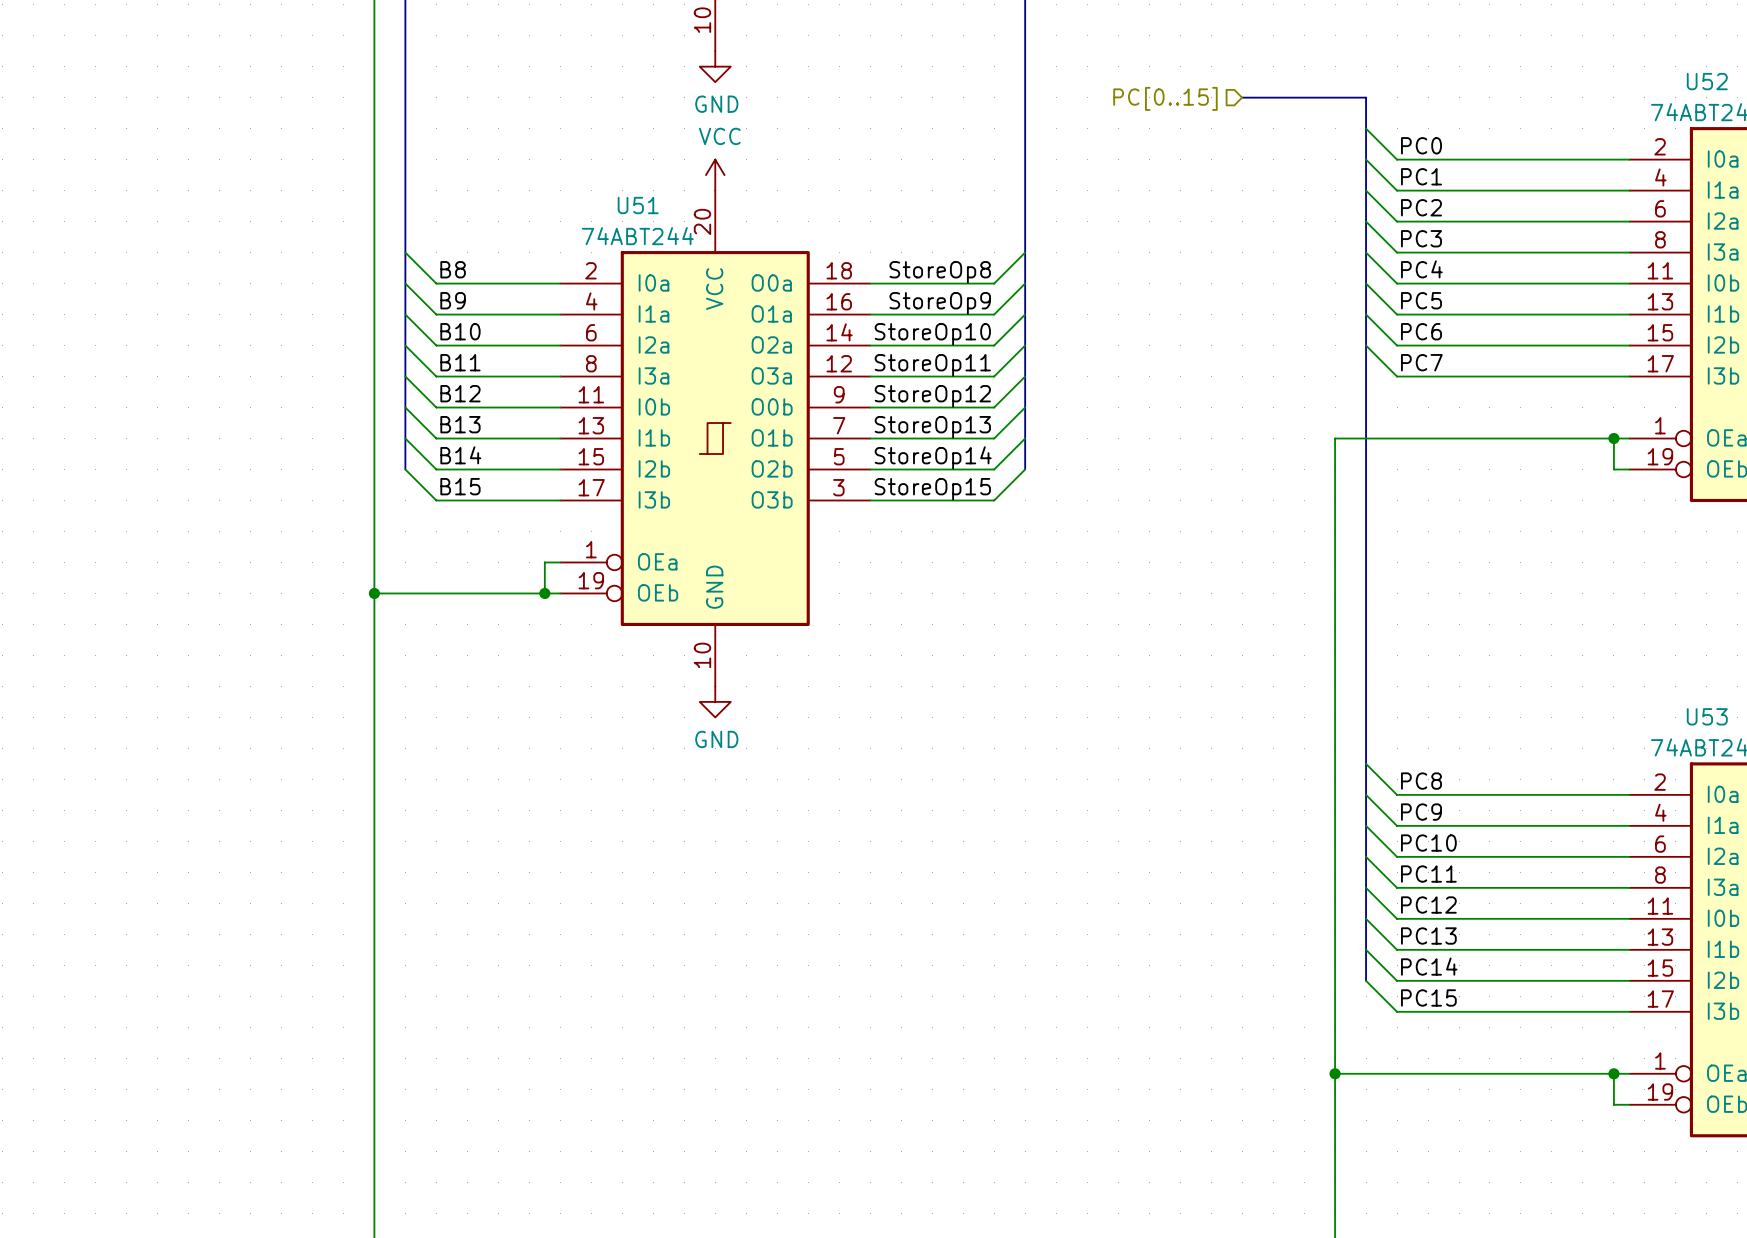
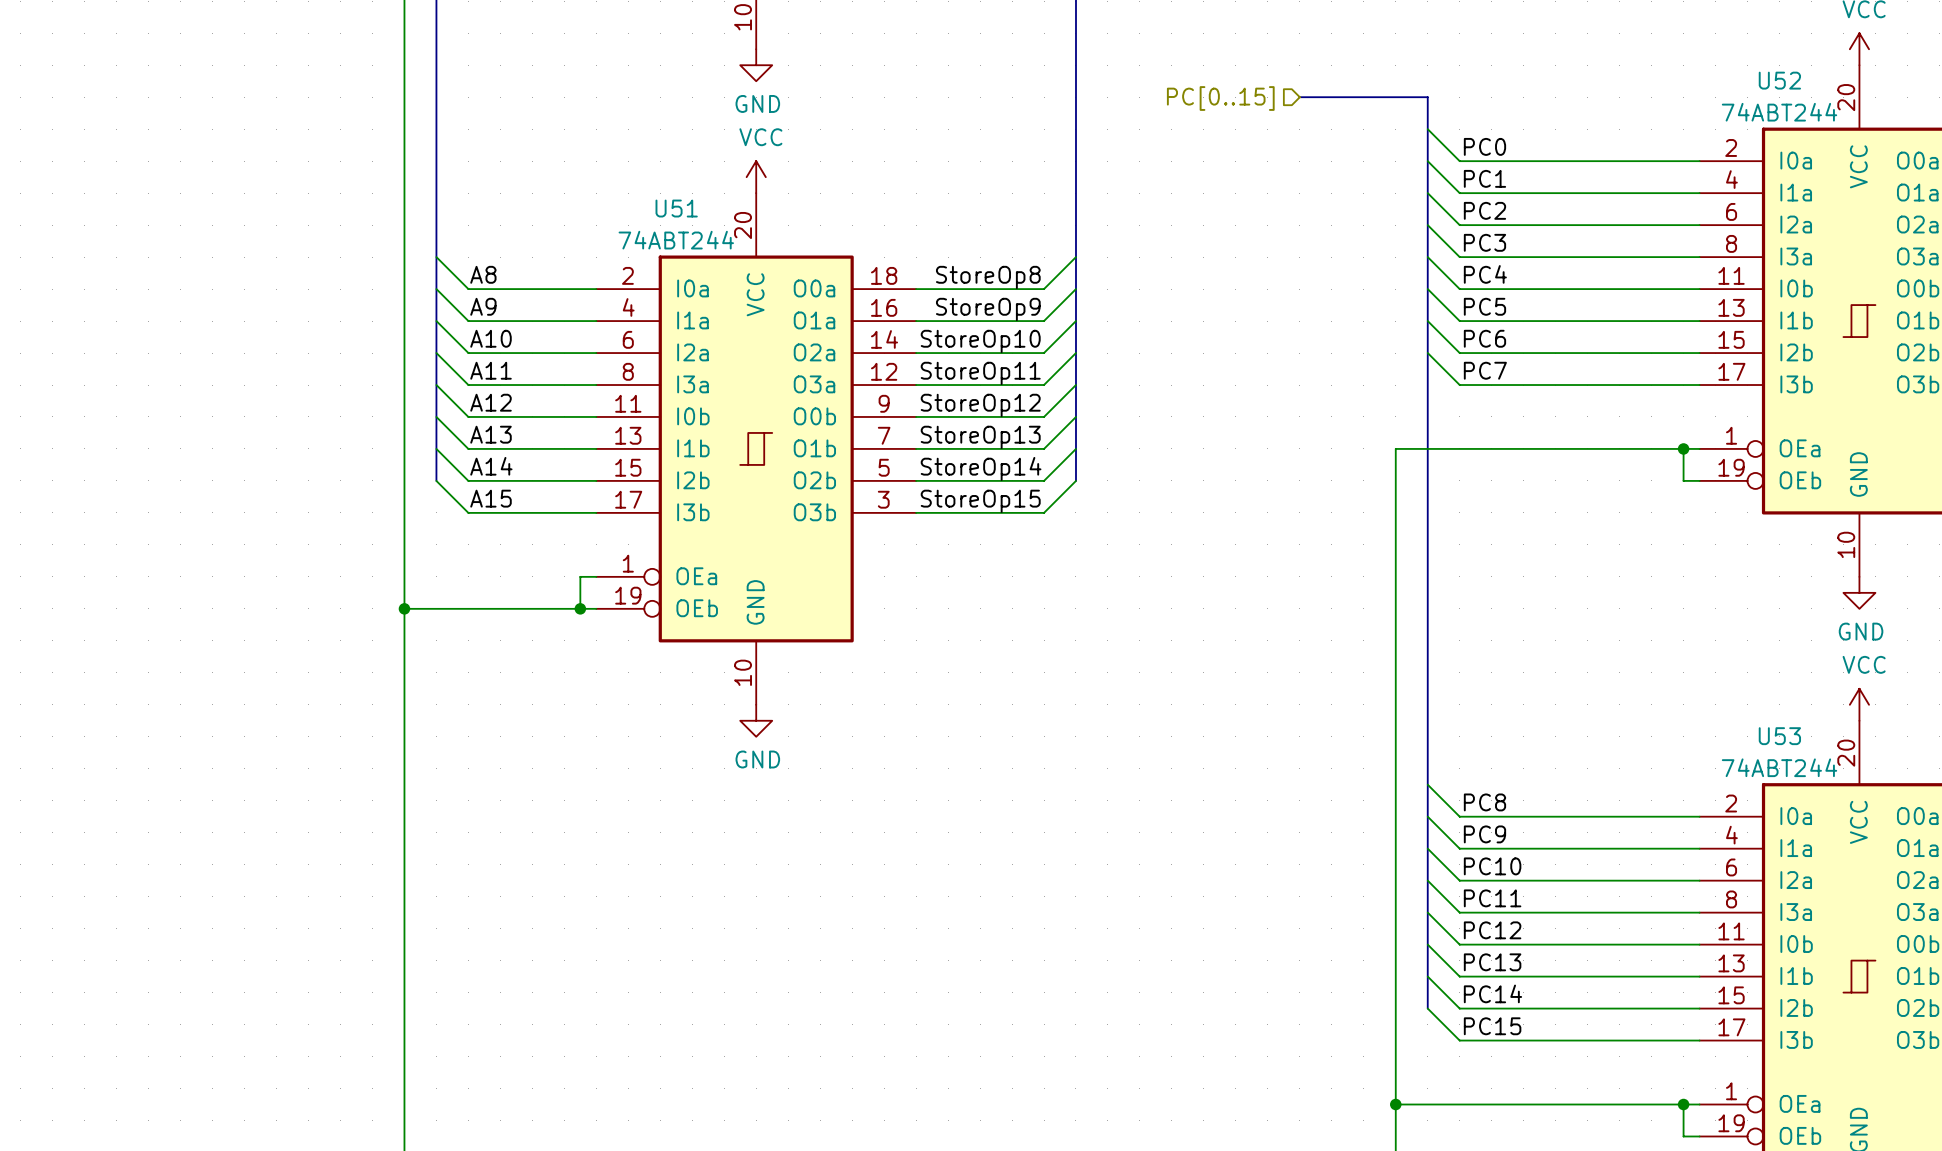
label: B8 (453, 269) -> A8 (483, 274)
label: B9 (453, 300) -> A9 (483, 306)
label: B10 (460, 331) -> A10 (491, 338)
label: B11 (460, 362) -> A11 (491, 370)
label: B12 (460, 393) -> A12 (491, 402)
label: B13 (460, 424) -> A13 (491, 434)
label: B14 (460, 455) -> A14 (491, 466)
label: B15 (460, 486) -> A15 (491, 498)

